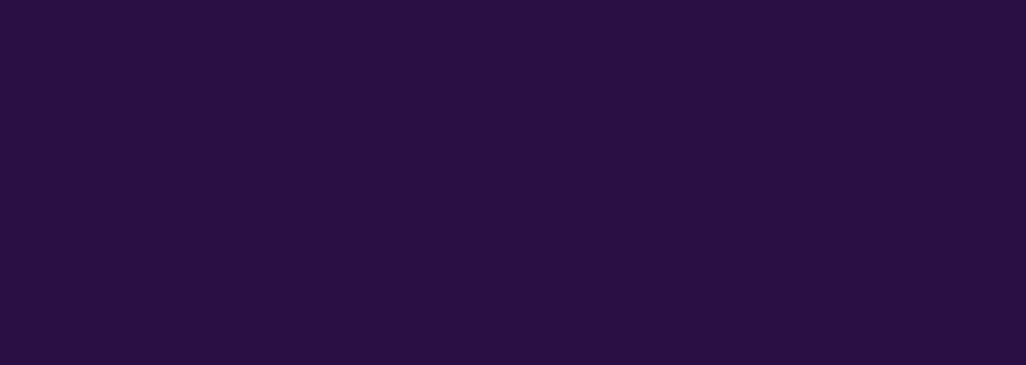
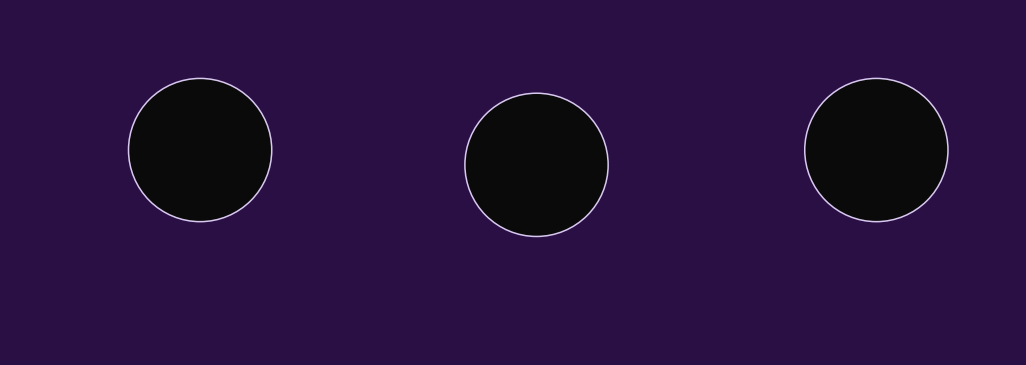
part: none -> (200, 150)
part: none -> (876, 150)
part: none -> (536, 164)

